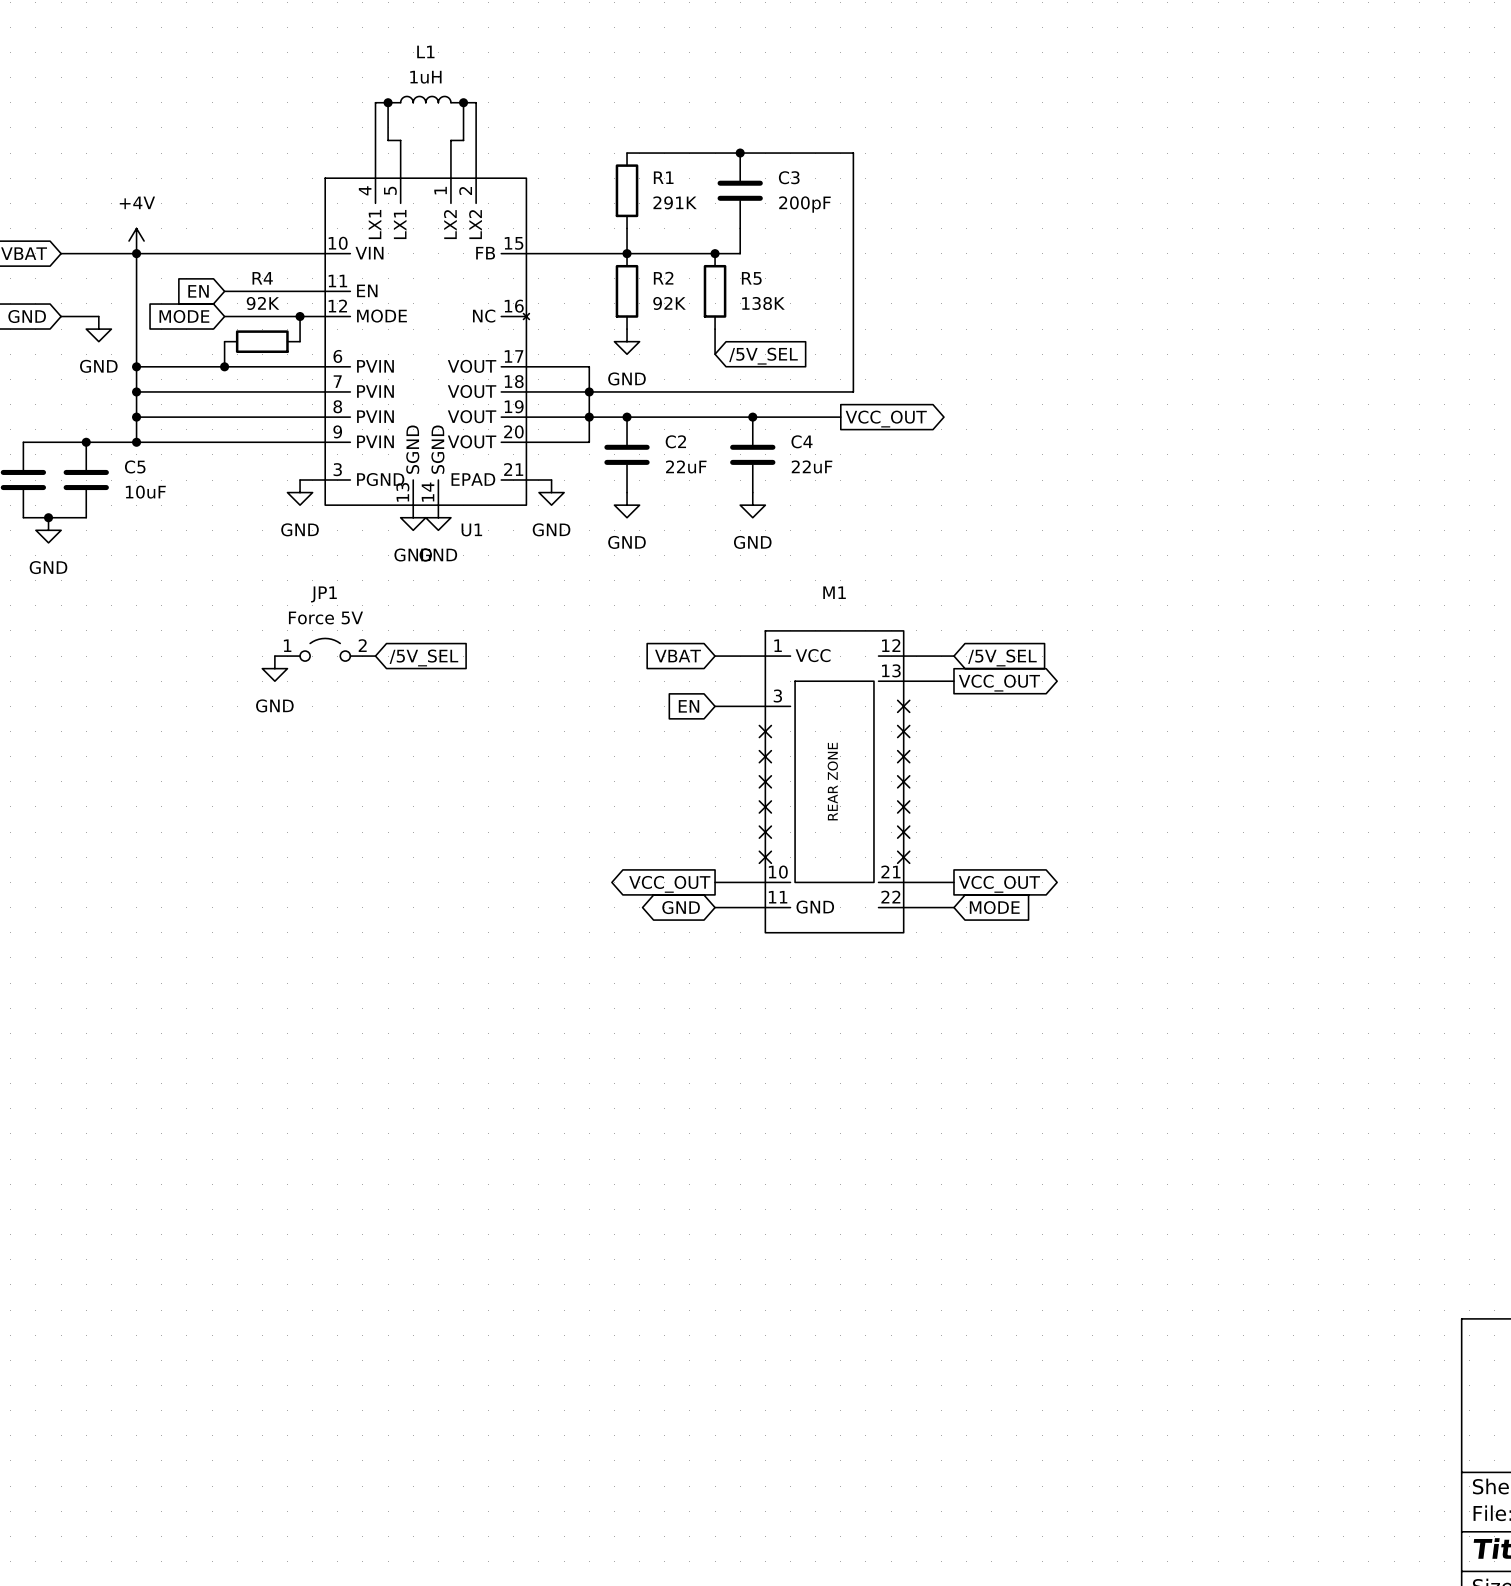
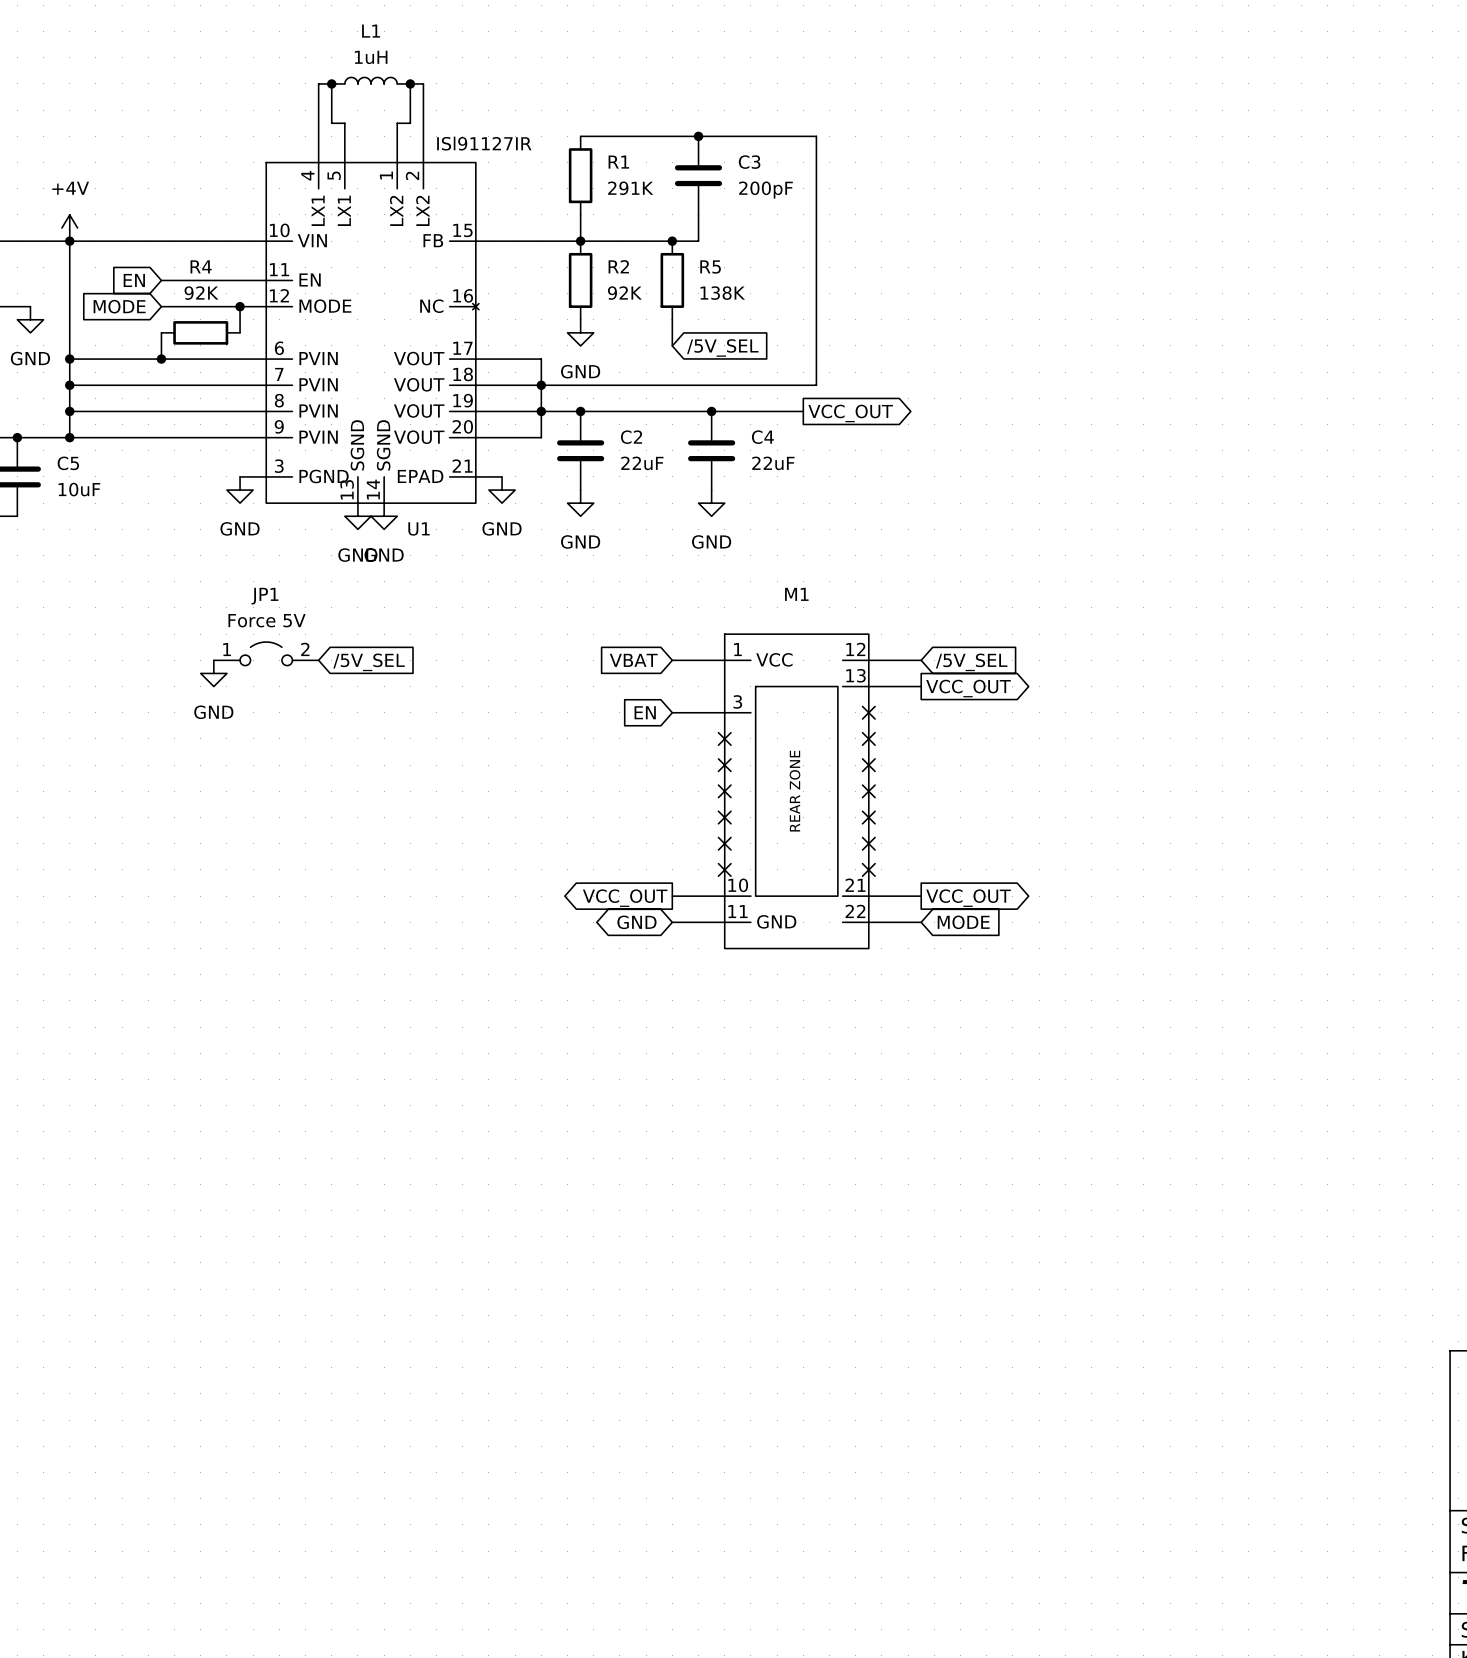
U1 value: none -> ISl91127IR (484, 143)

